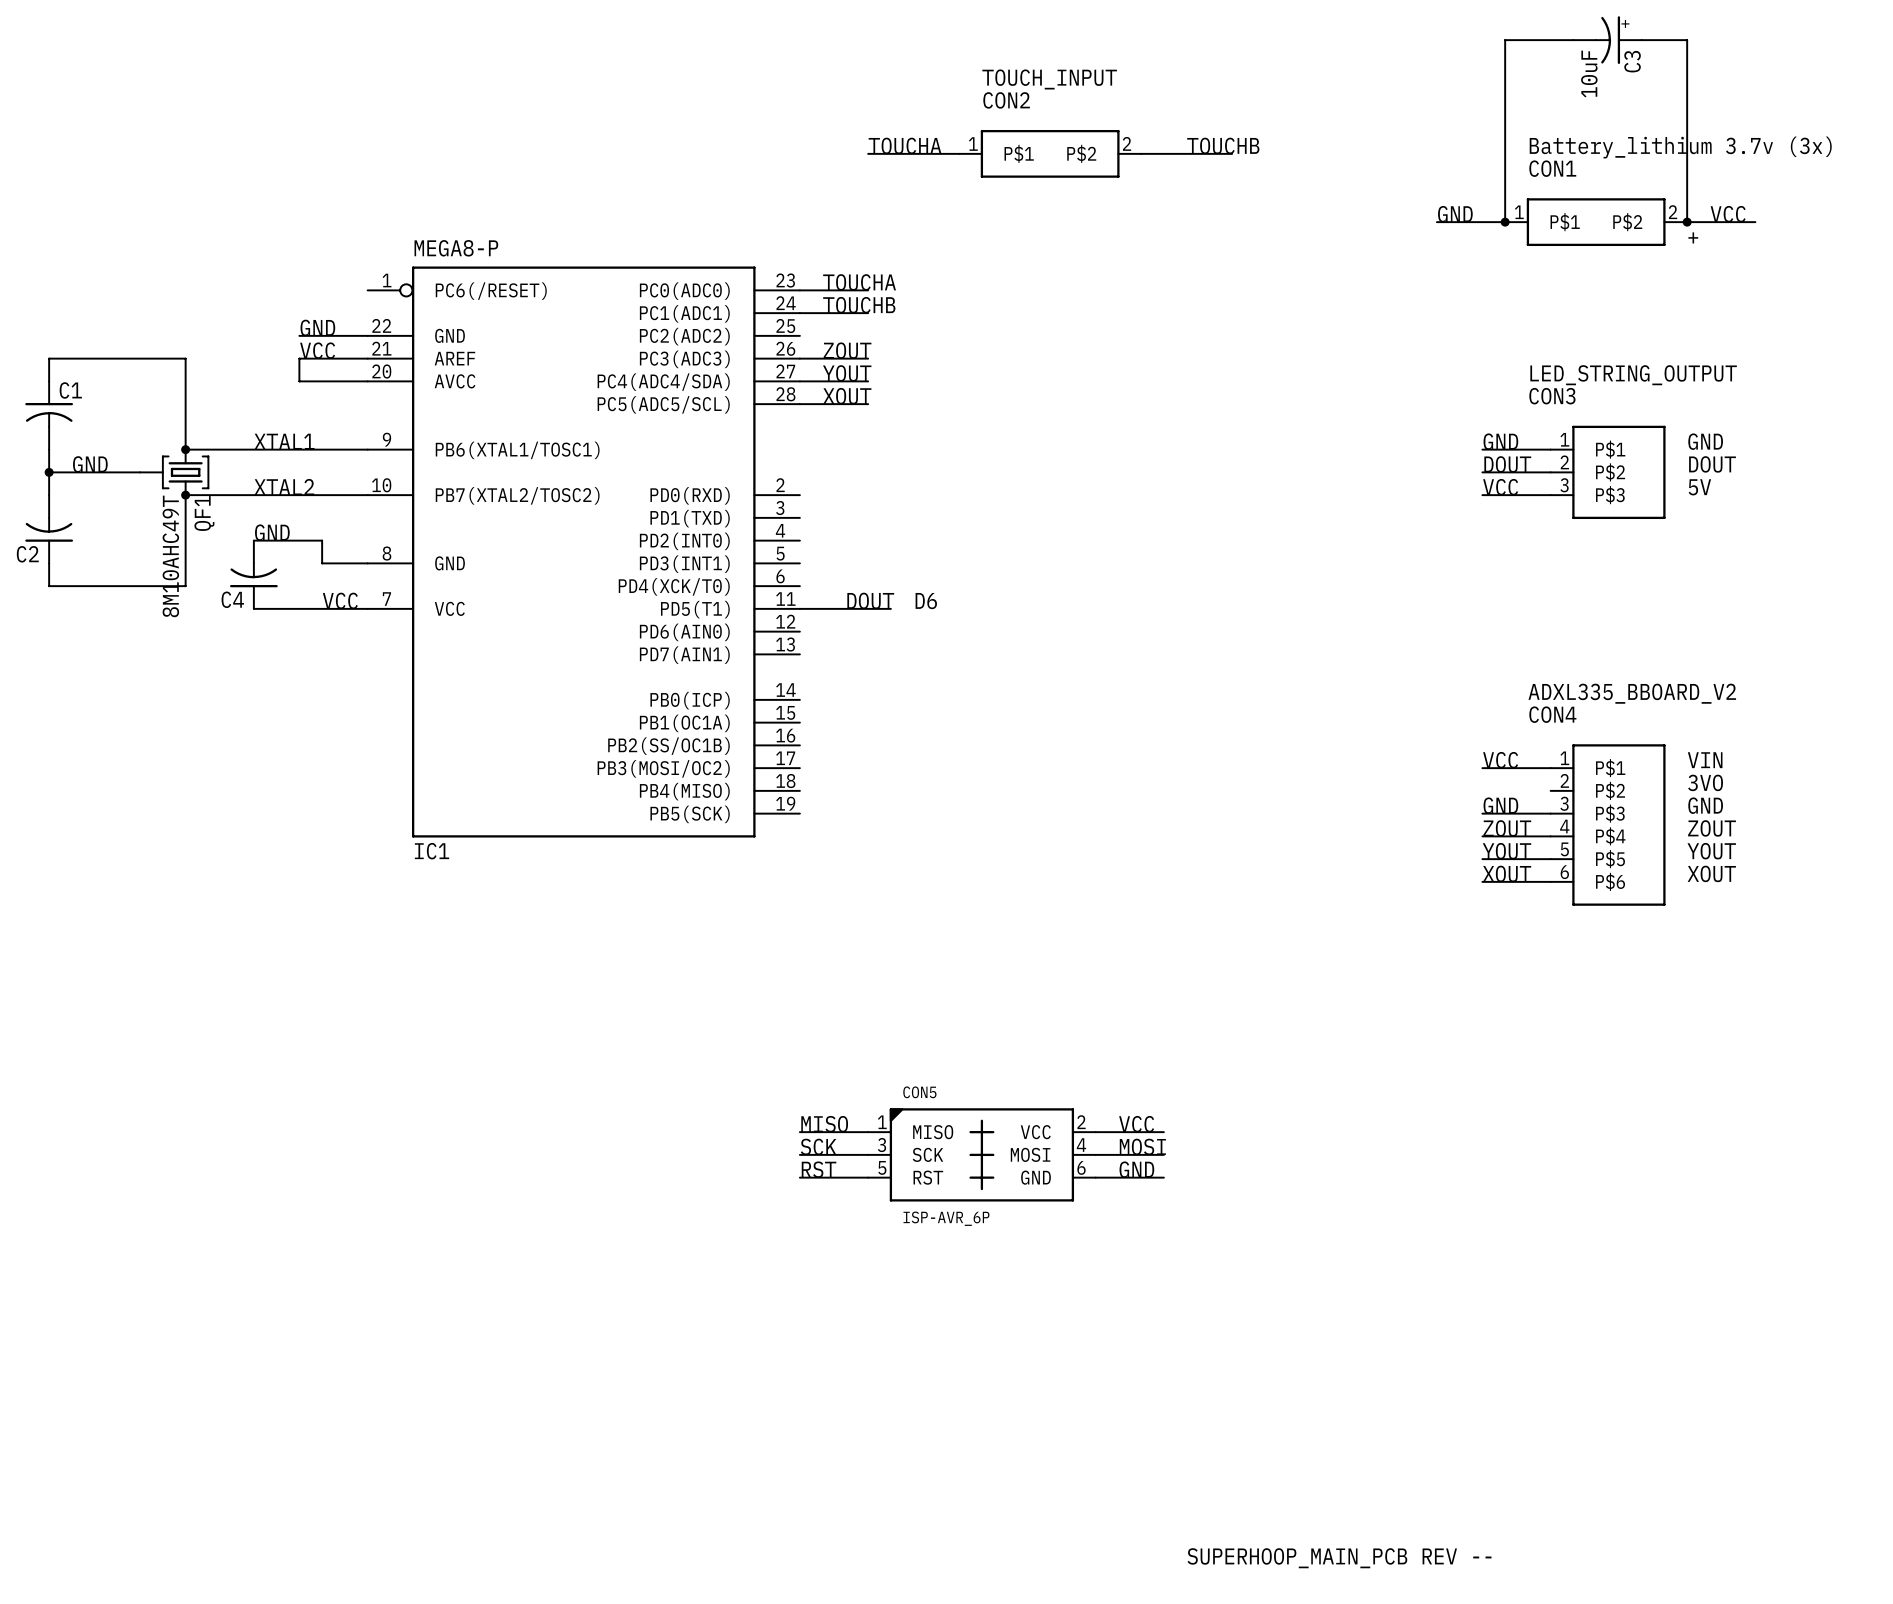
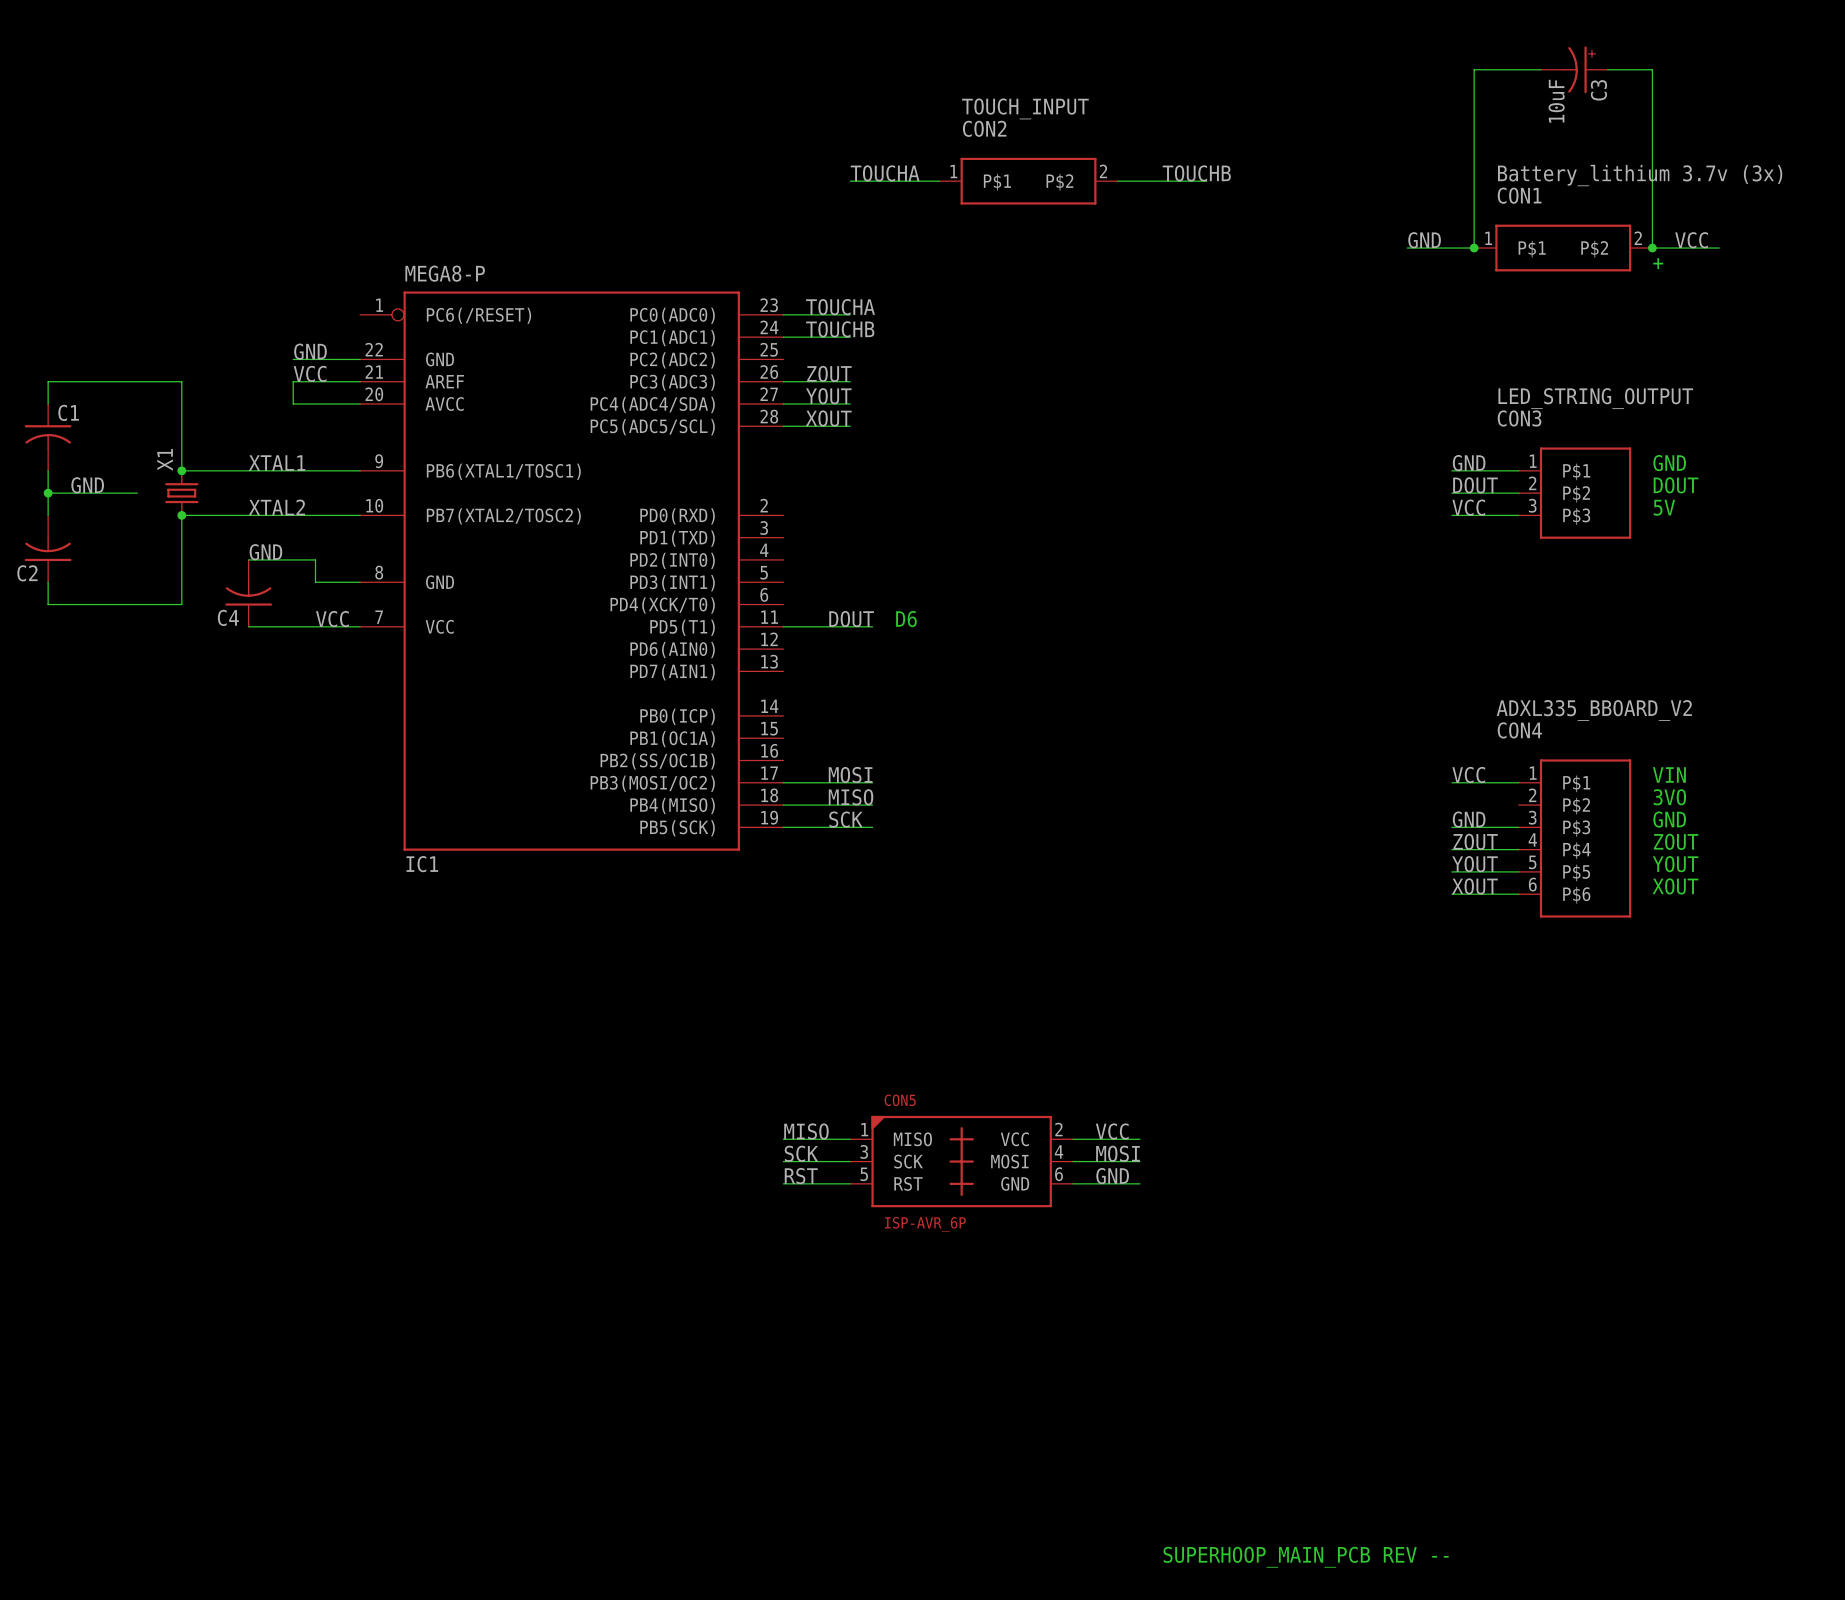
QF1: 8M10AHC49T (174, 472) -> none
X1: none -> (181, 493)
label: none -> MOSI (850, 775)
wire: none -> (783, 782) (872, 782)
label: none -> MISO (851, 797)
wire: none -> (783, 805) (872, 805)
label: none -> SCK (845, 819)
wire: none -> (783, 827) (872, 827)

